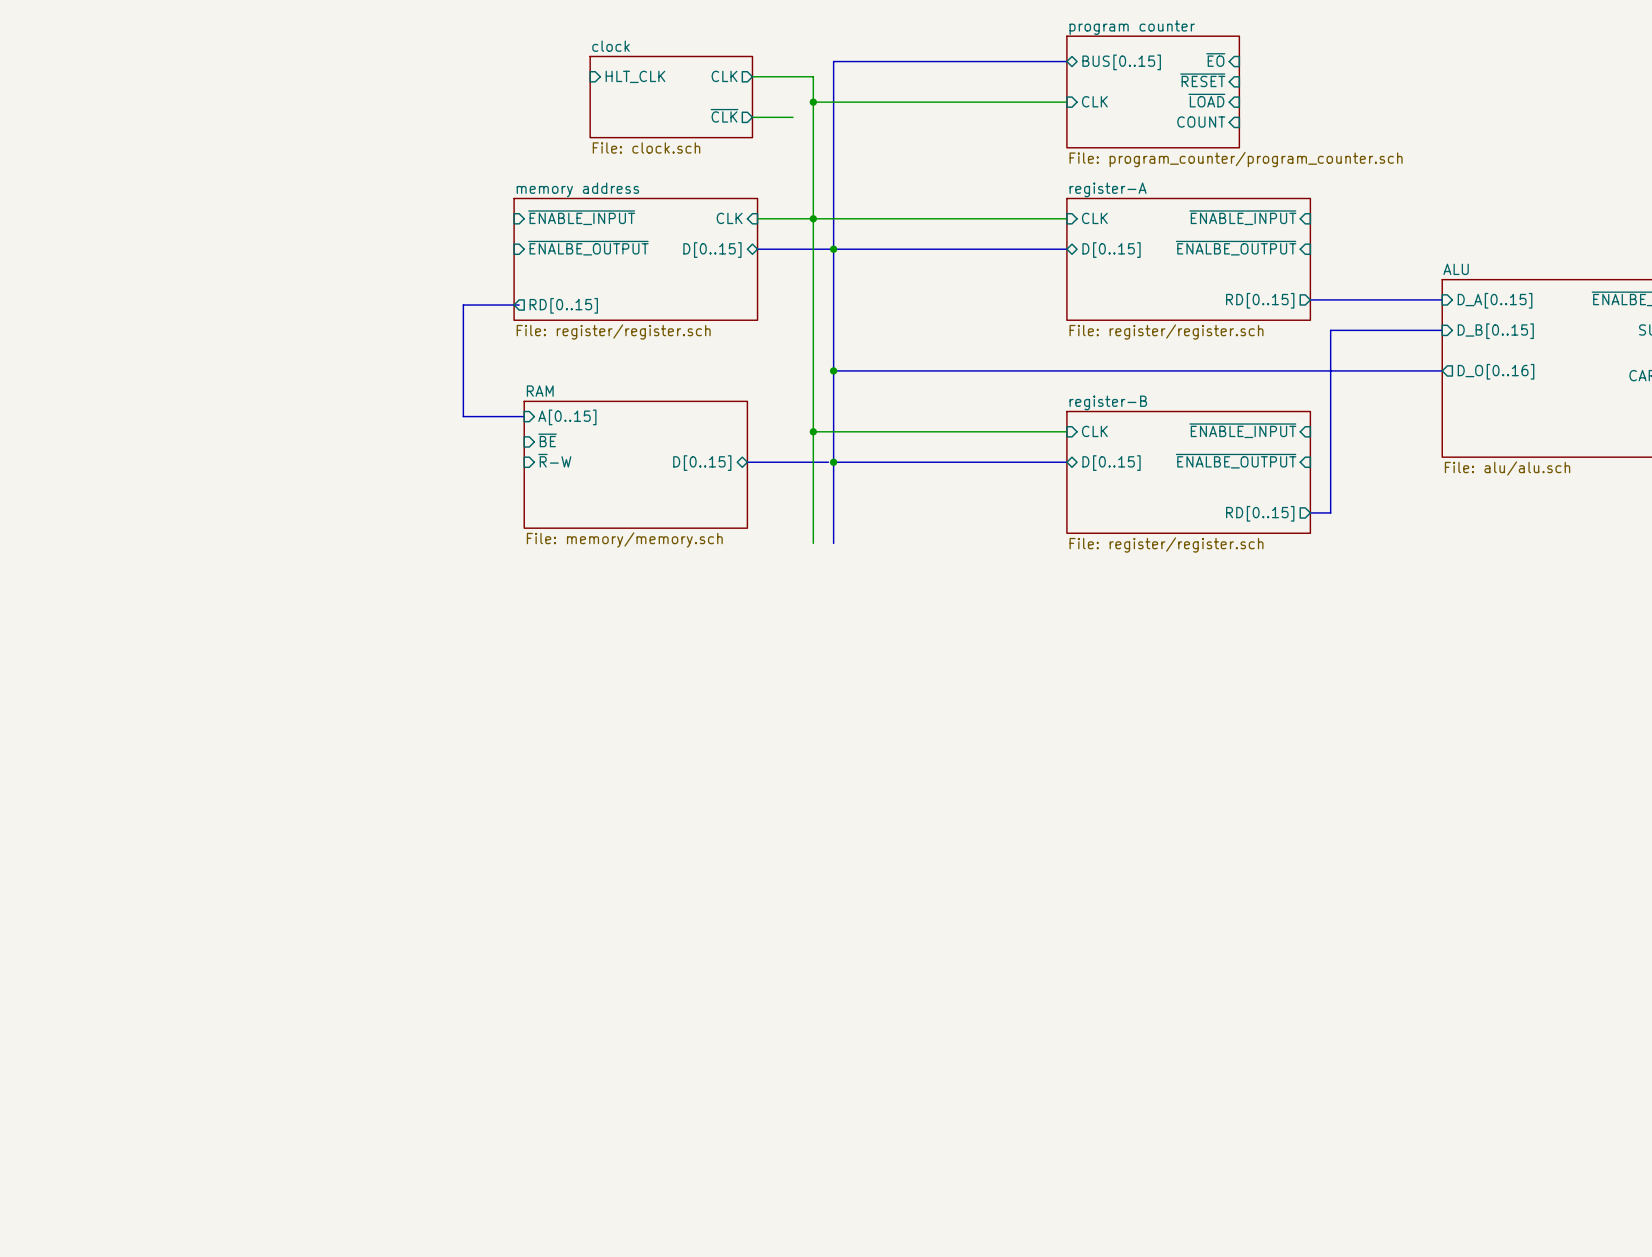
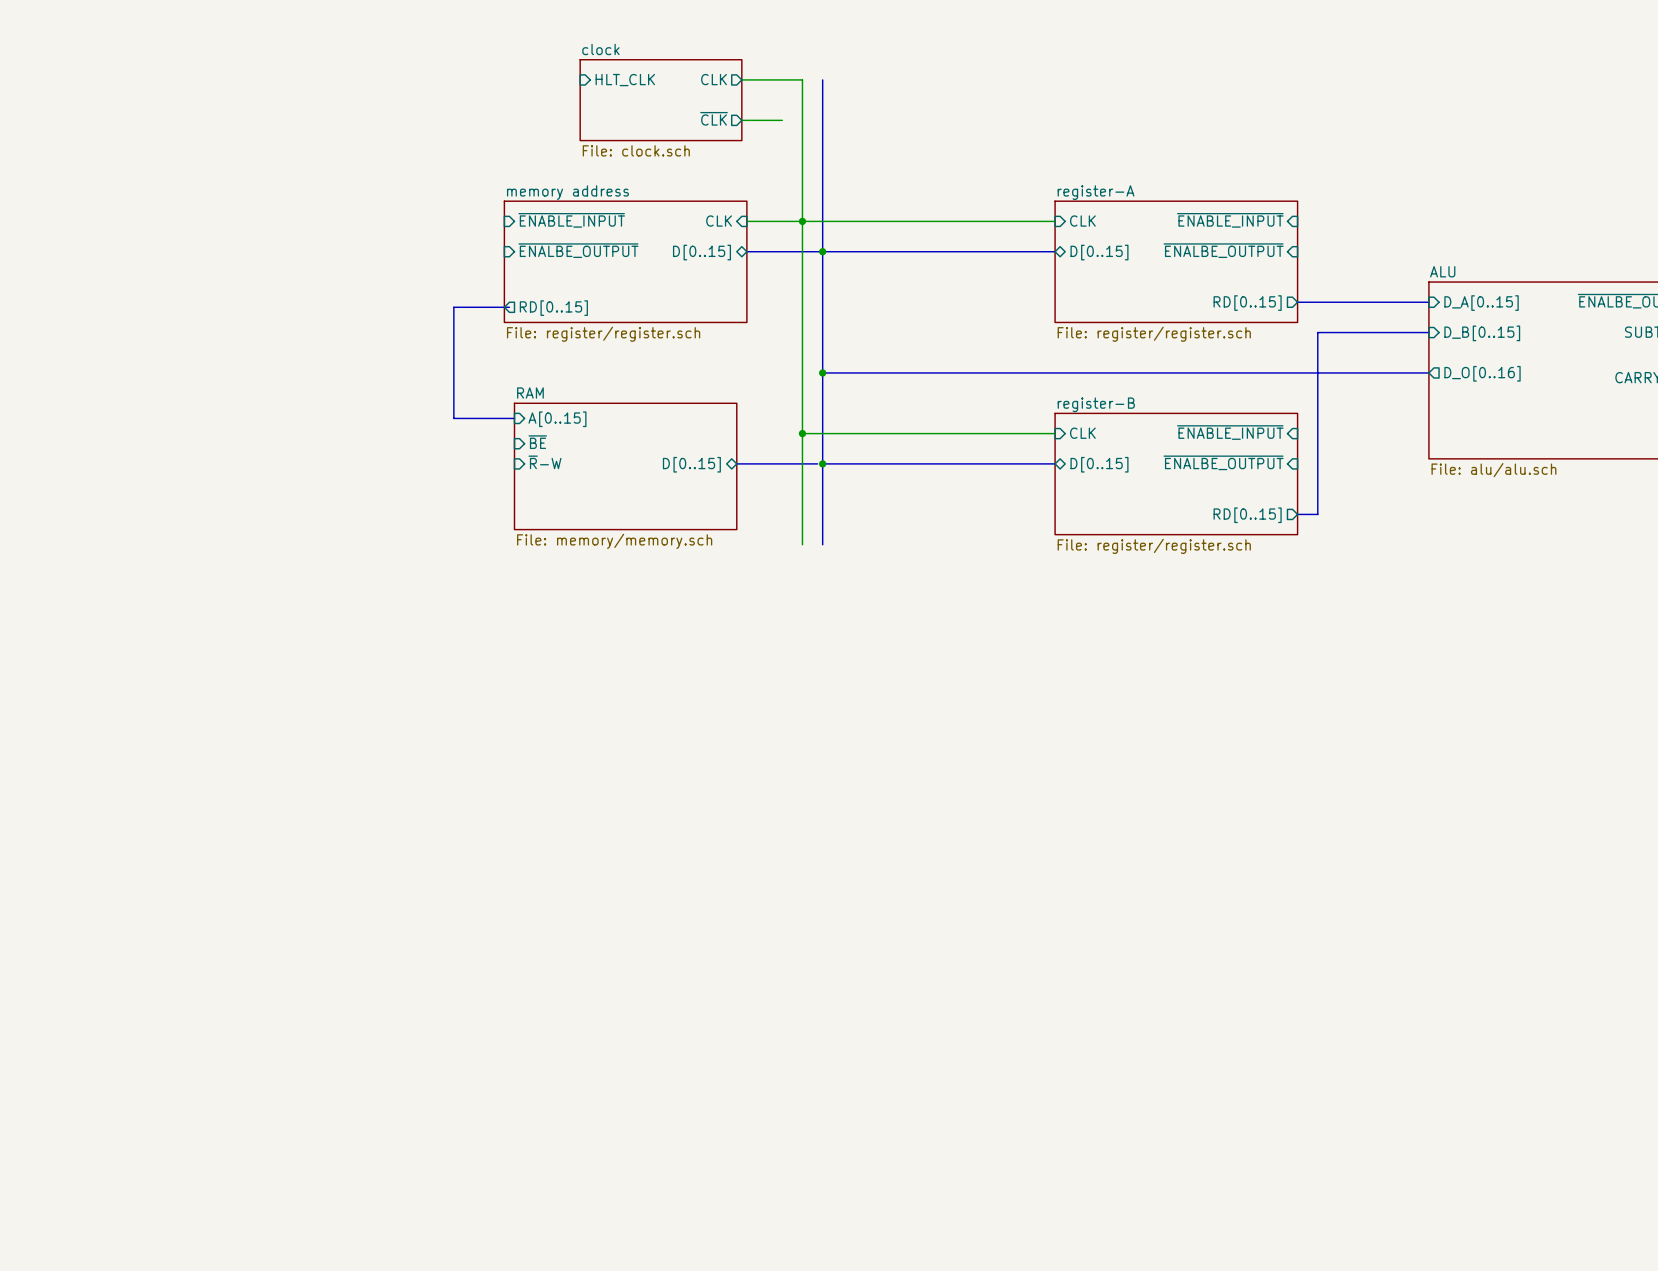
sheet pin: ~{EO} (1215, 60) -> none
bus: (1066, 61) (833, 61) (833, 76) -> none
sheet pin: BUS[0..15] (1121, 62) -> none
sheet pin: ~{RESET} (1202, 80) -> none
sheet program counter: File: program_counter/program_counter.sch (1153, 91) -> none
sheet pin: ~{LOAD} (1206, 100) -> none
sheet pin: CLK (1094, 101) -> none
wire: (813, 102) (1066, 102) -> none
junction: (813, 102) -> none
sheet pin: COUNT (1201, 122) -> none

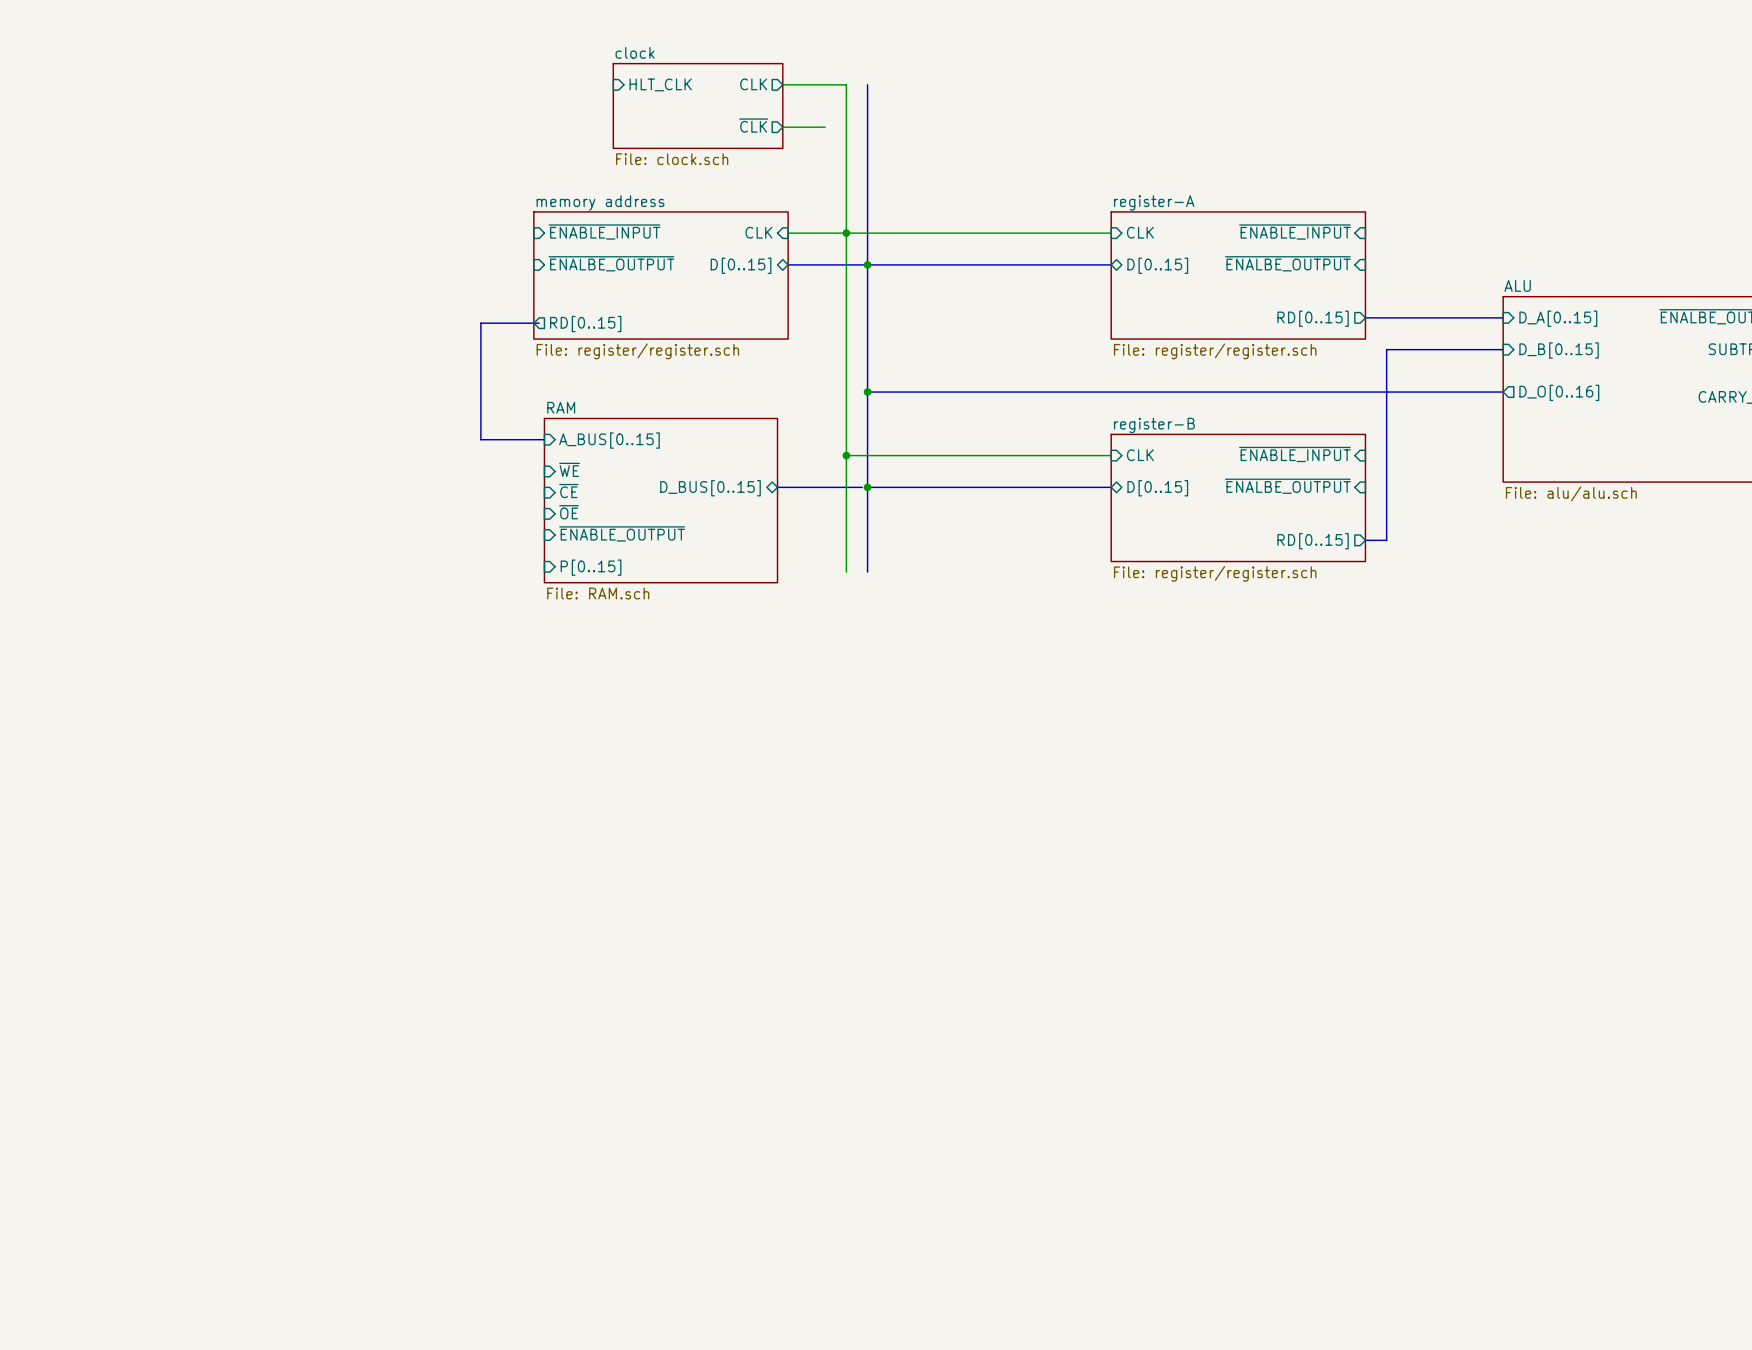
sheet pin: A[0..15] (557, 419) -> A_BUS[0..15] (609, 440)
sheet pin: ~{BE} (537, 442) -> ~{WE} (569, 469)
sheet pin: ~{R}-W (544, 462) -> ~{CE} (568, 491)
sheet pin: D[0..15] (691, 464) -> D_BUS[0..15] (710, 488)
sheet RAM: File: memory/memory.sch (625, 466) -> none
sheet RAM: none -> File: RAM.sch (660, 500)
sheet pin: none -> ~{OE} (569, 512)
sheet pin: none -> ~{ENABLE_OUTPUT} (622, 533)
sheet pin: none -> P[0..15] (591, 567)

